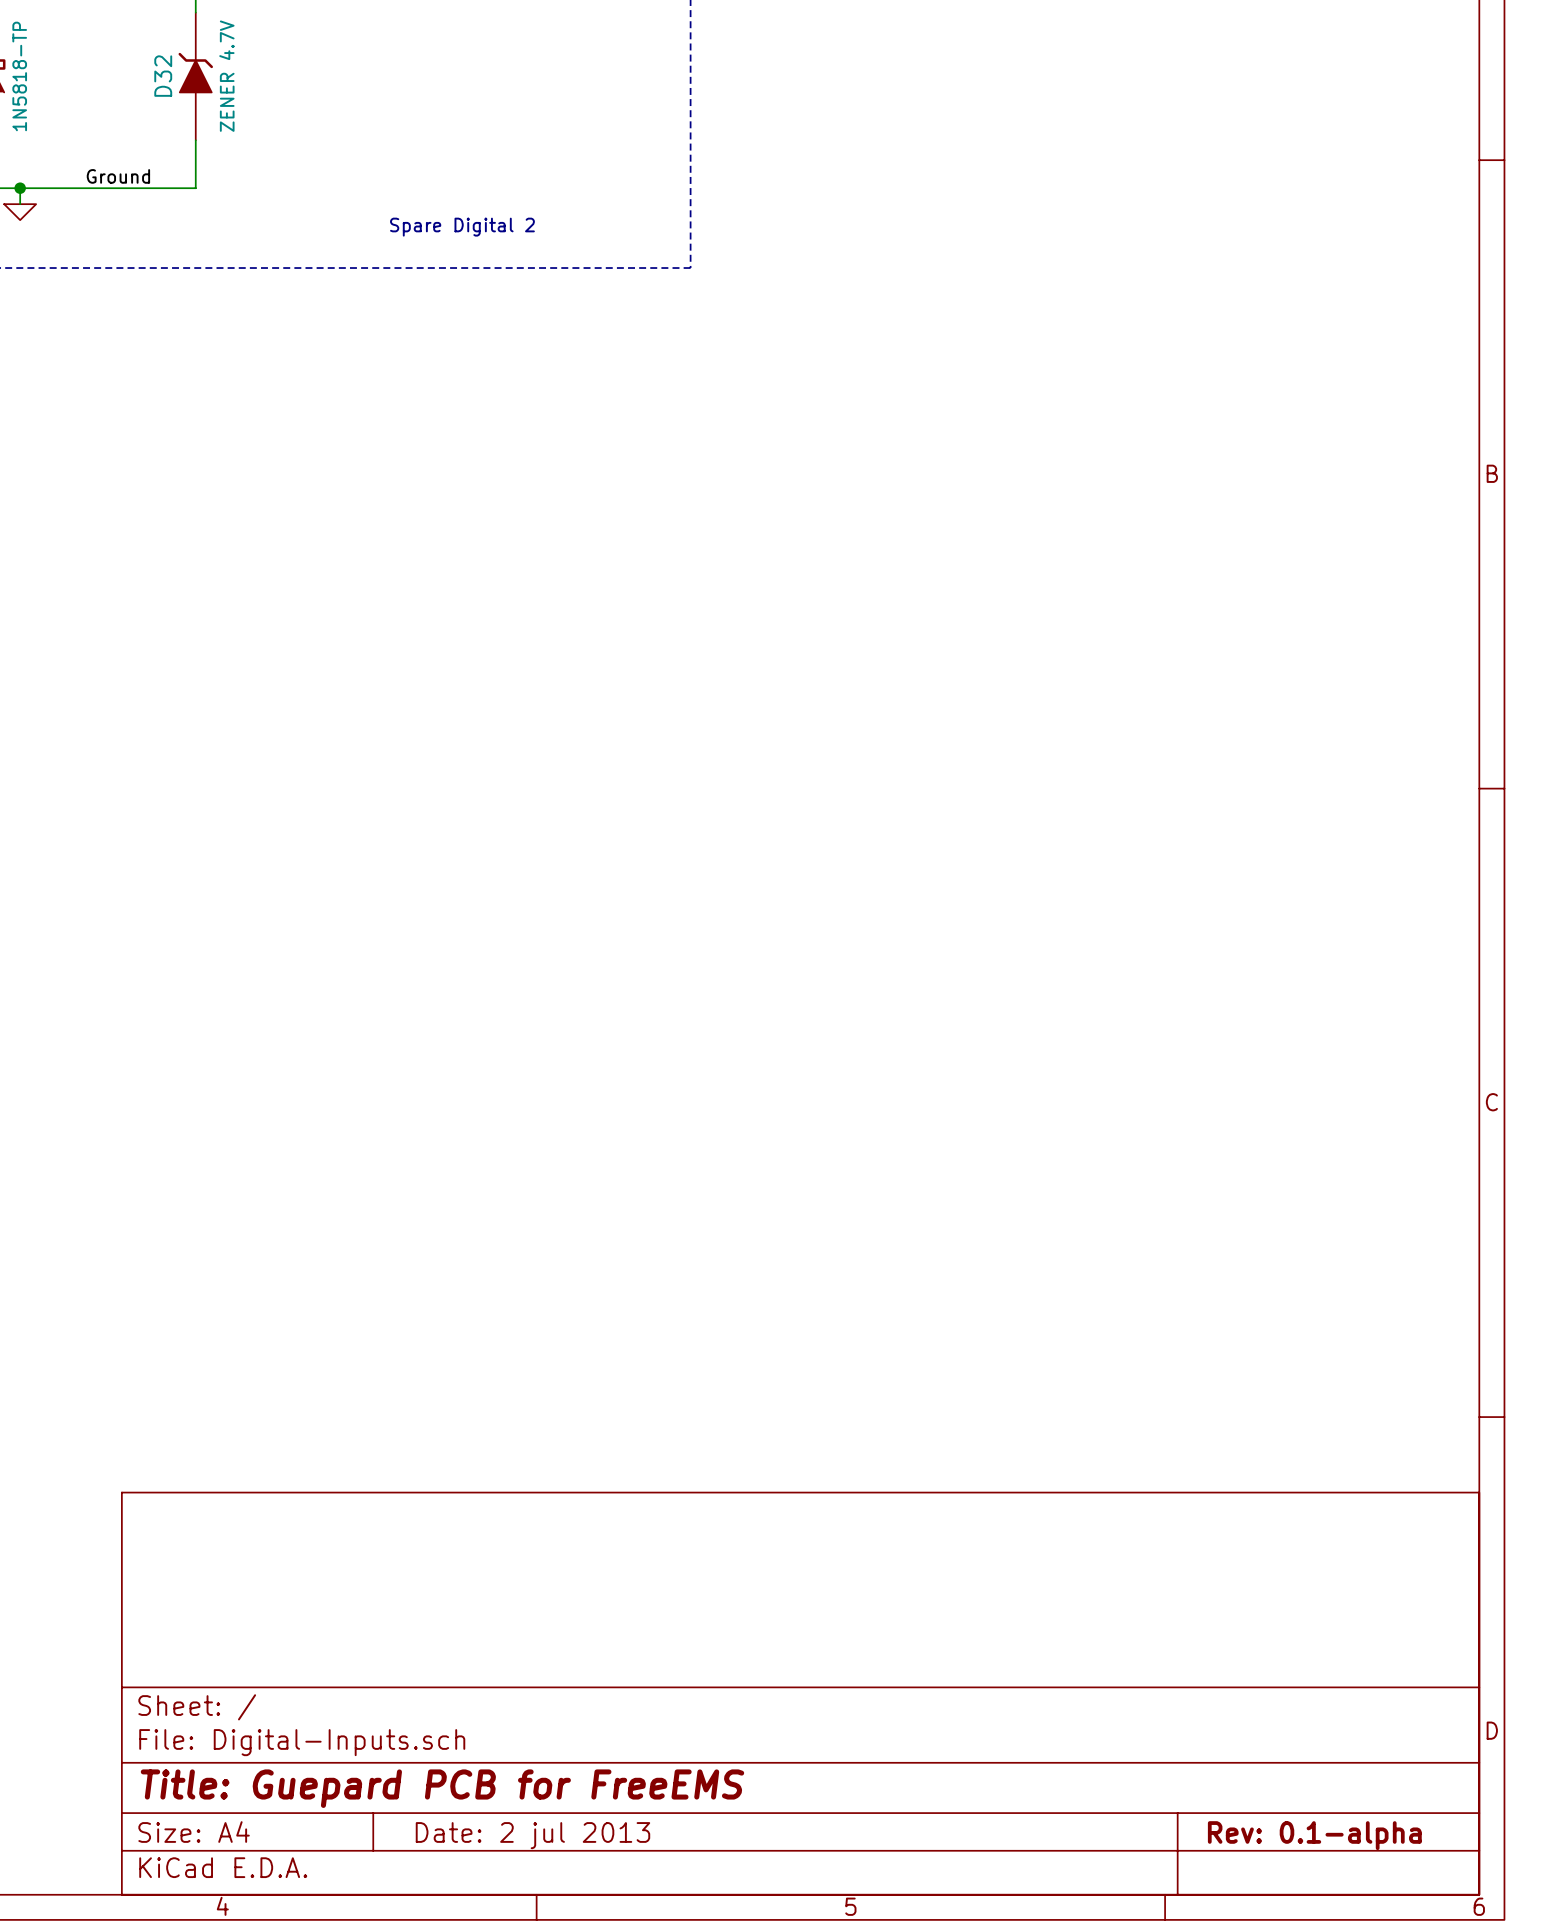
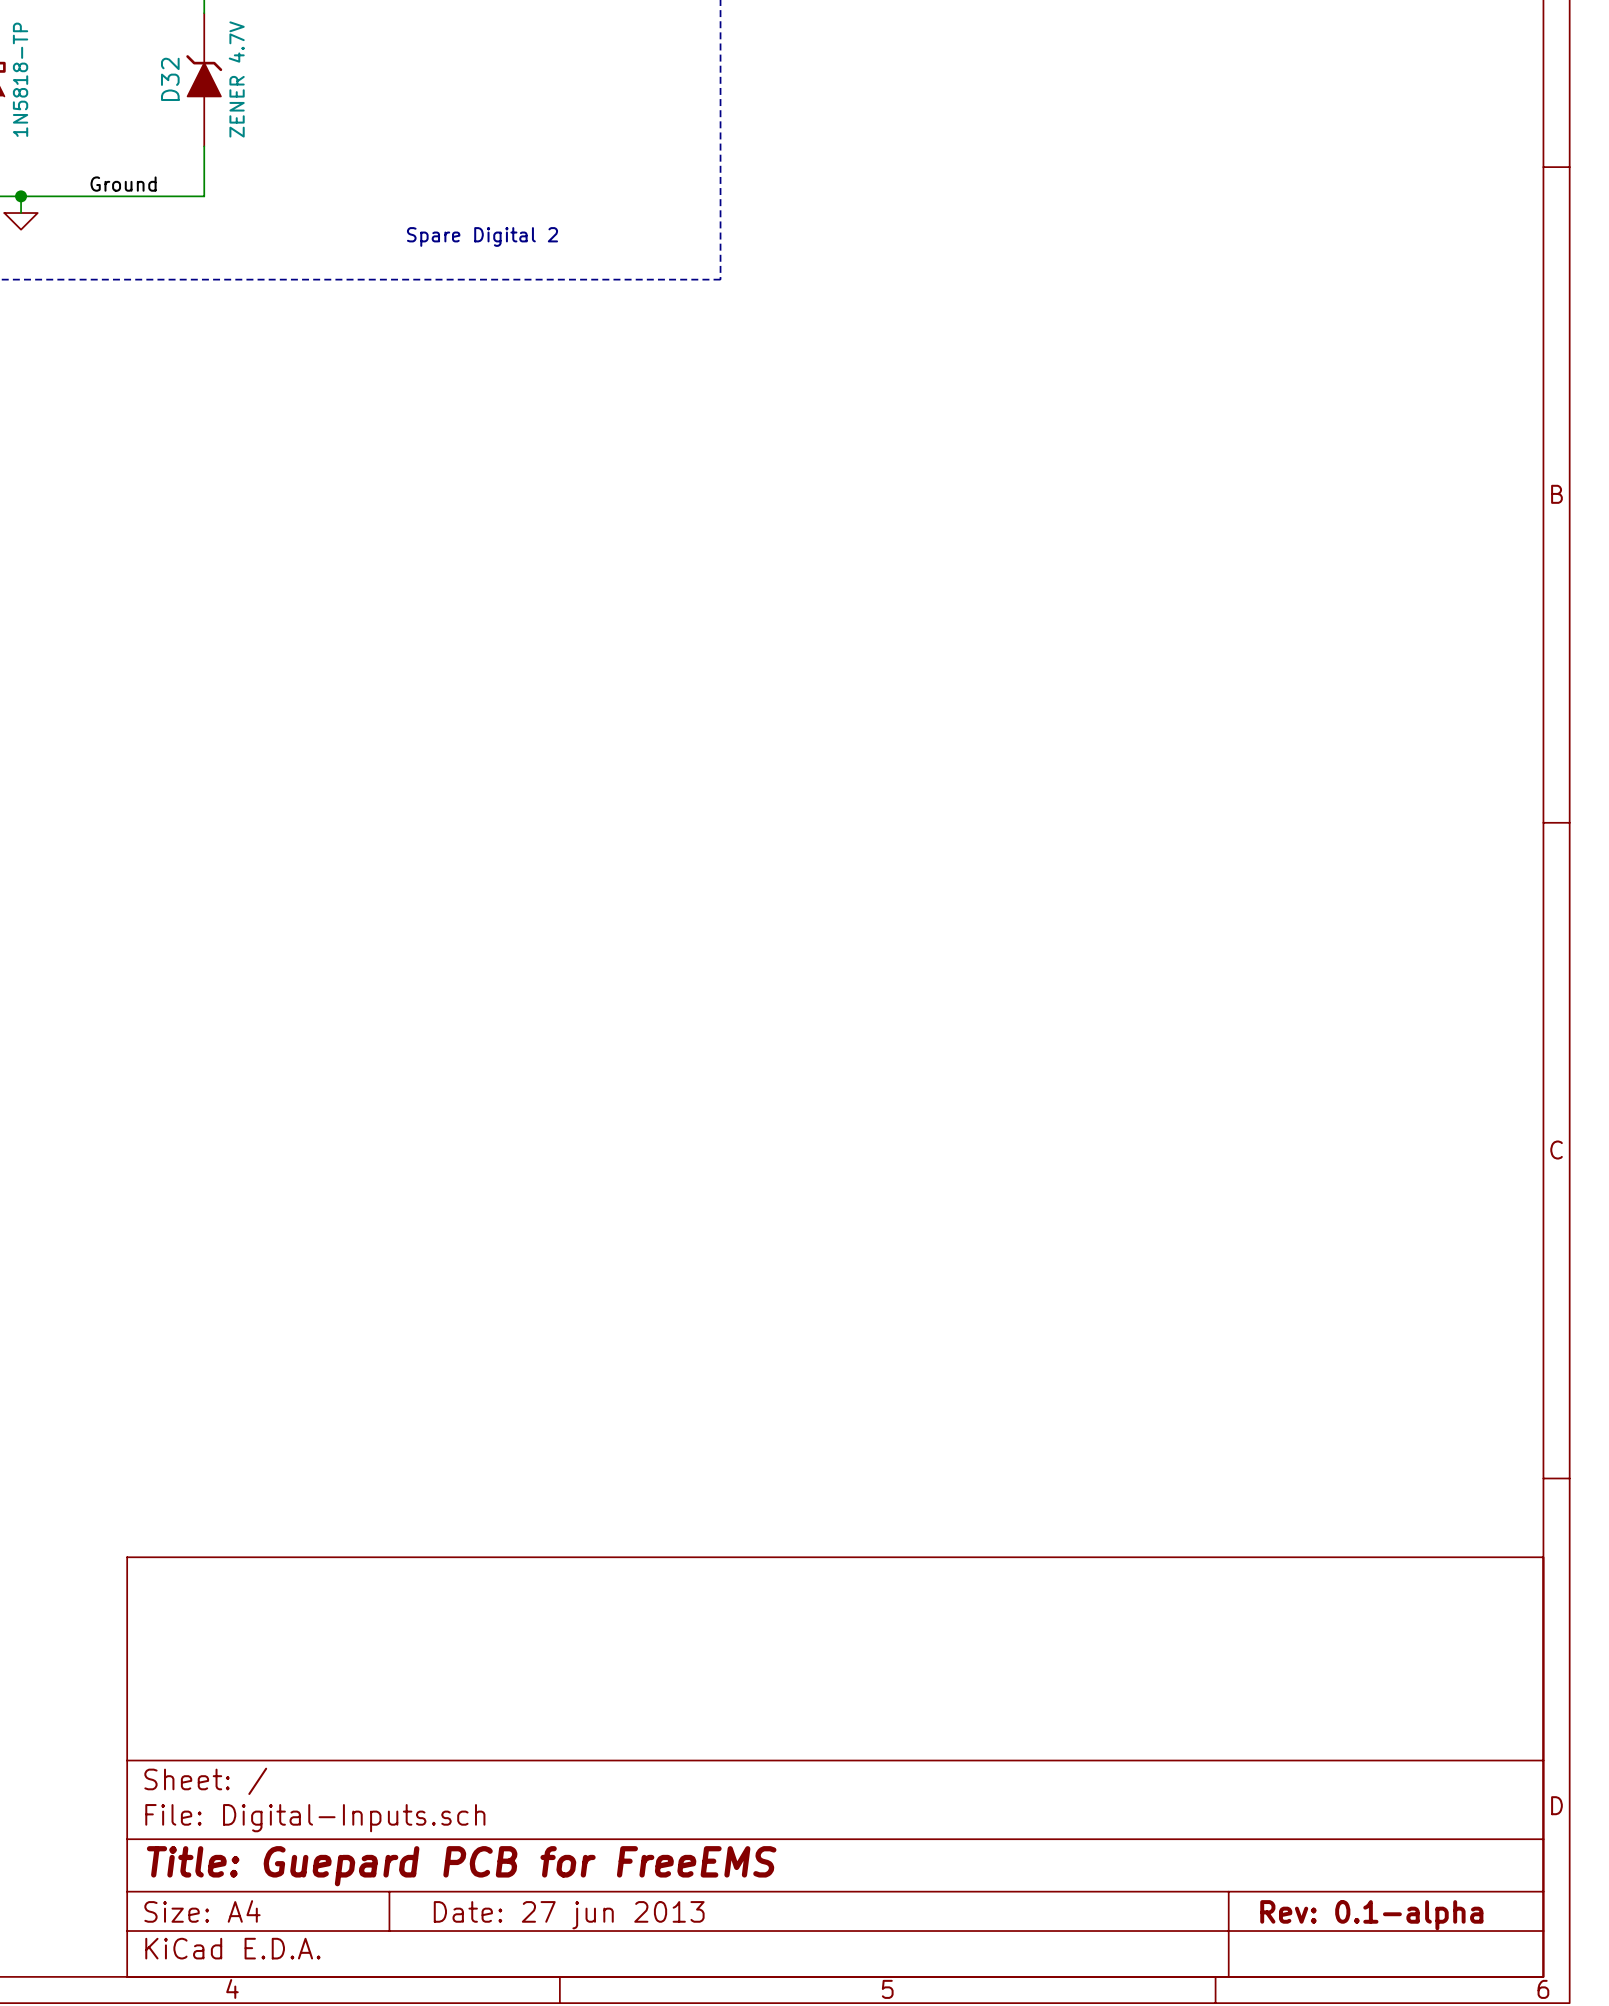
title block: Date: 2 jul 2013 (532, 1835) -> Date: 27 jun 2013 (569, 1915)

